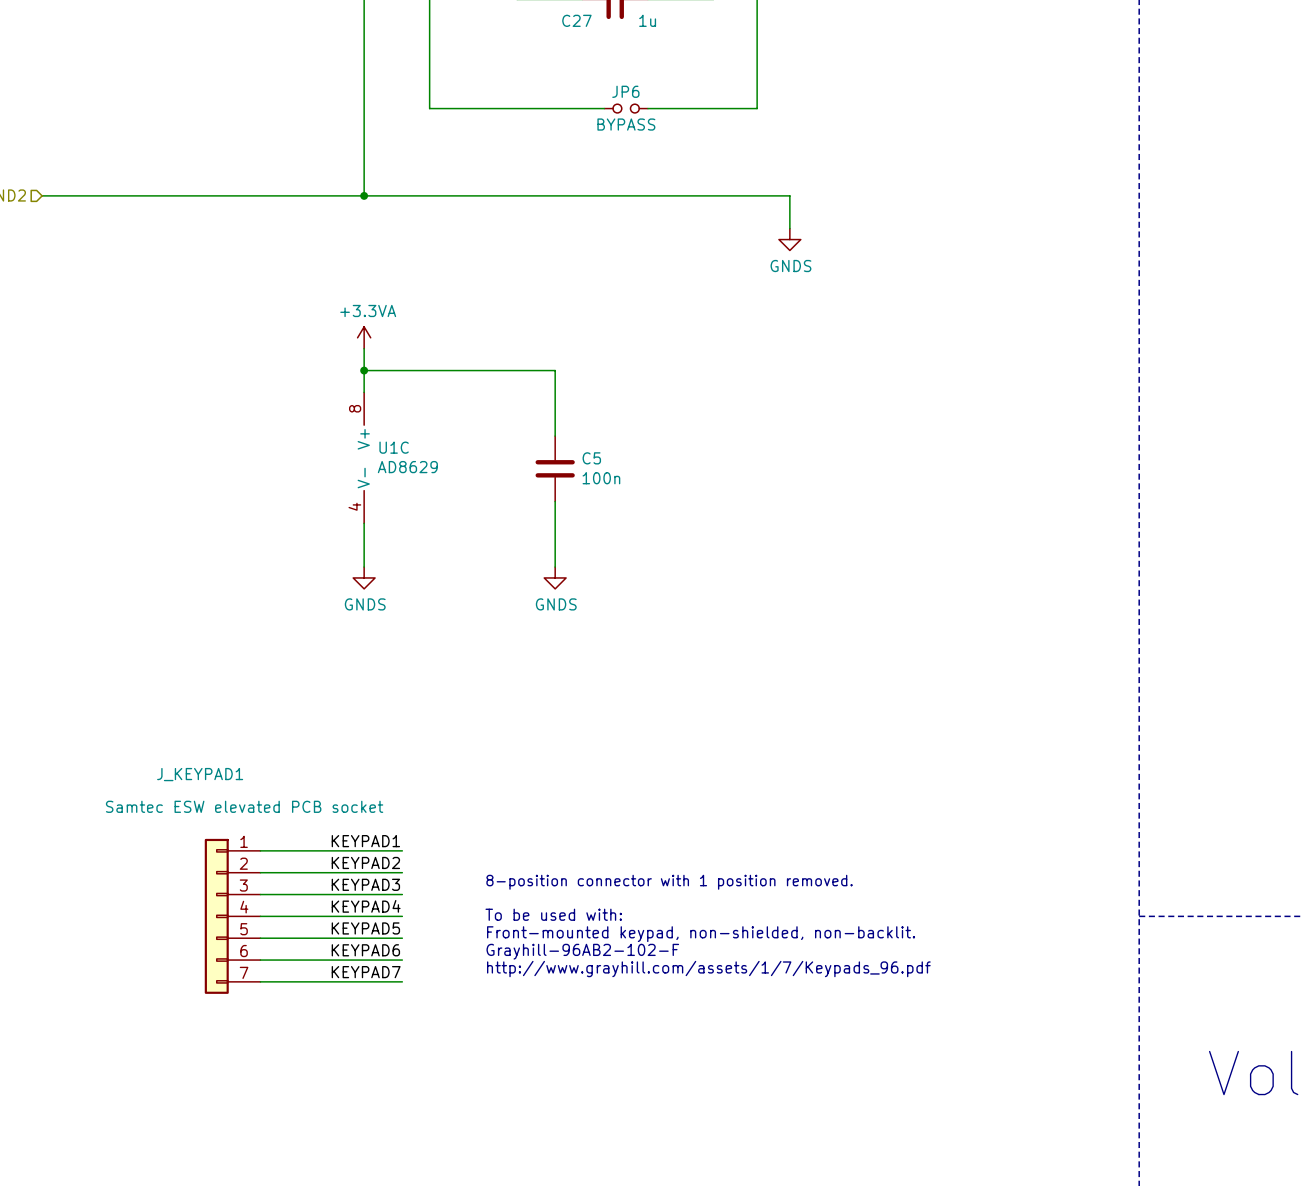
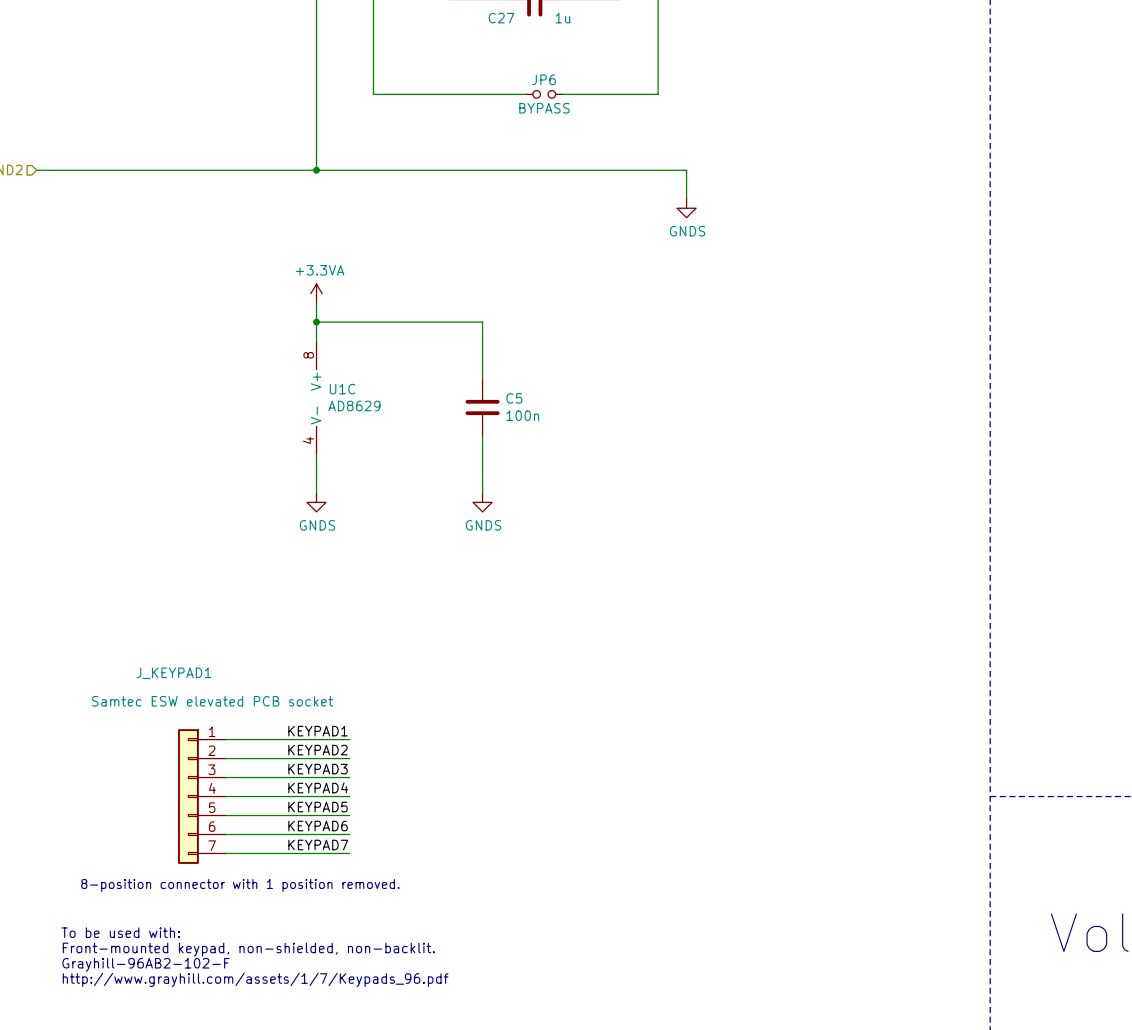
text: 8-position connector with 1 position removed. (669, 882) -> none
text: To be used with: (553, 914) -> none
text: Front-mounted keypad, non-shielded, non-backlit. (701, 934) -> none
text: Grayhill-96AB2-102-F (582, 951) -> none
text: http://www.grayhill.com/assets/1/7/Keypads_96.pdf (708, 969) -> none
text: none -> 8-position connector with 1 position removed. (240, 885)
text: none -> To be used with: (120, 932)
text: none -> Front-mounted keypad, non-shielded, non-backlit. (248, 949)
text: none -> Grayhill-96AB2-102-F (146, 964)
text: none -> http://www.grayhill.com/assets/1/7/Keypads_96.pdf (255, 979)

